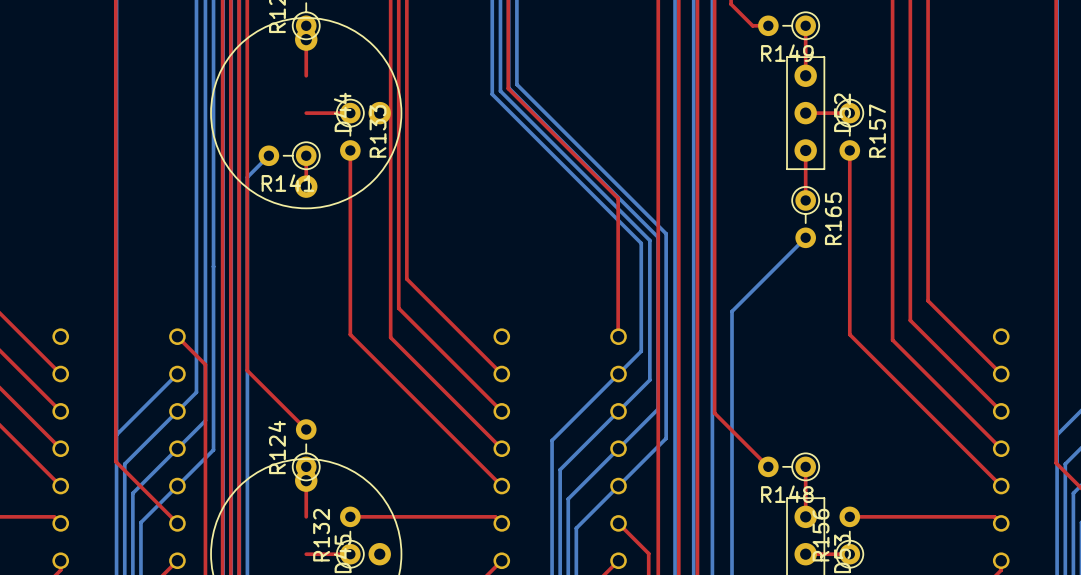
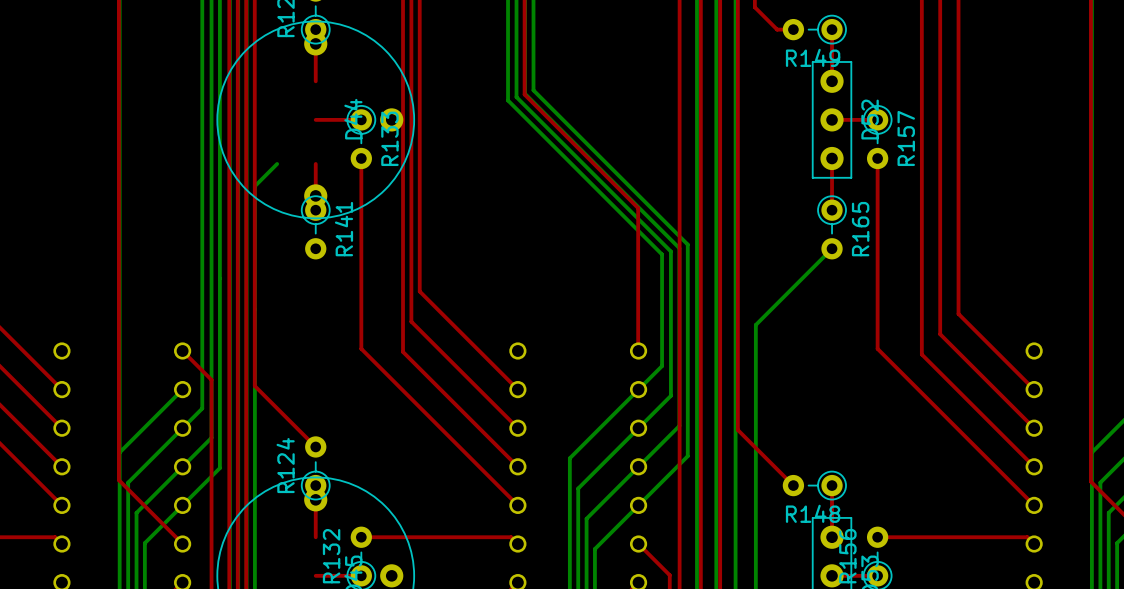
R141 rotation: 0° (289, 155) -> 90° counterclockwise (315, 227)
R141 position: (289, 155) -> (315, 227)

